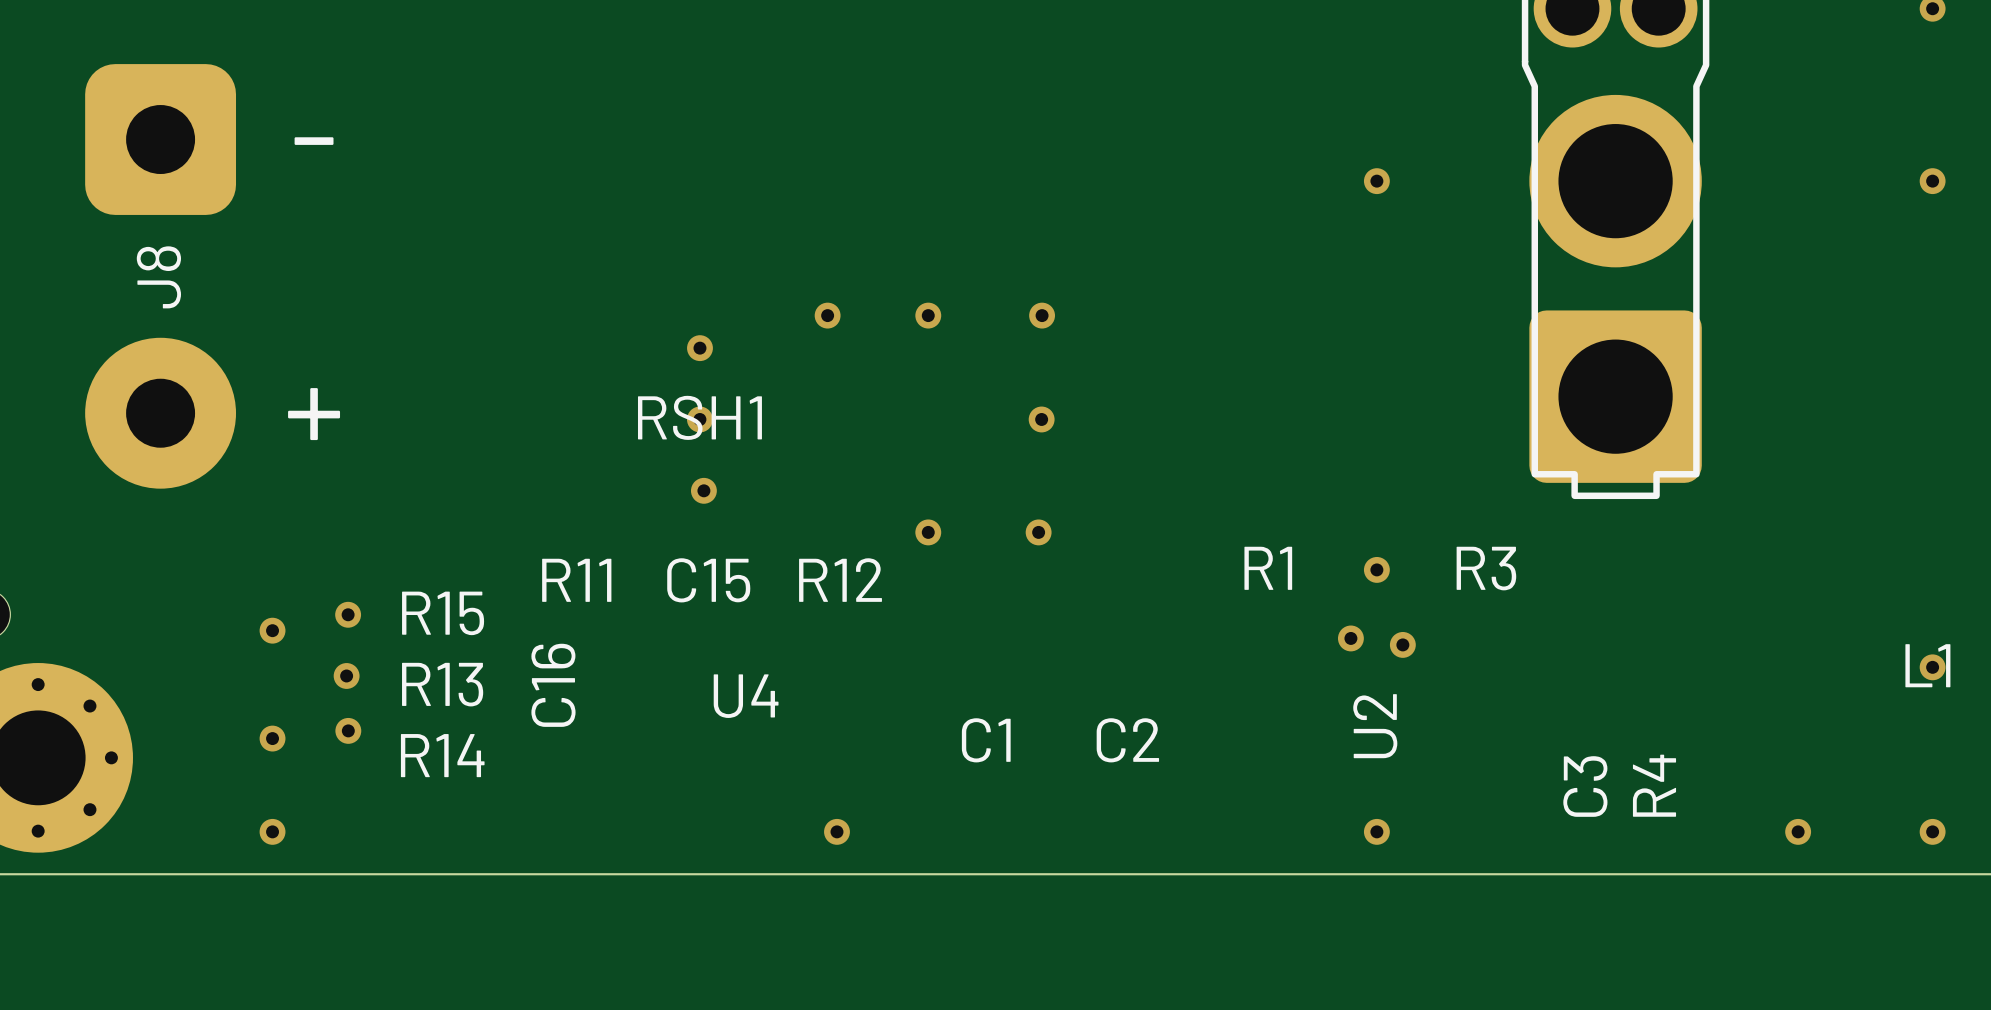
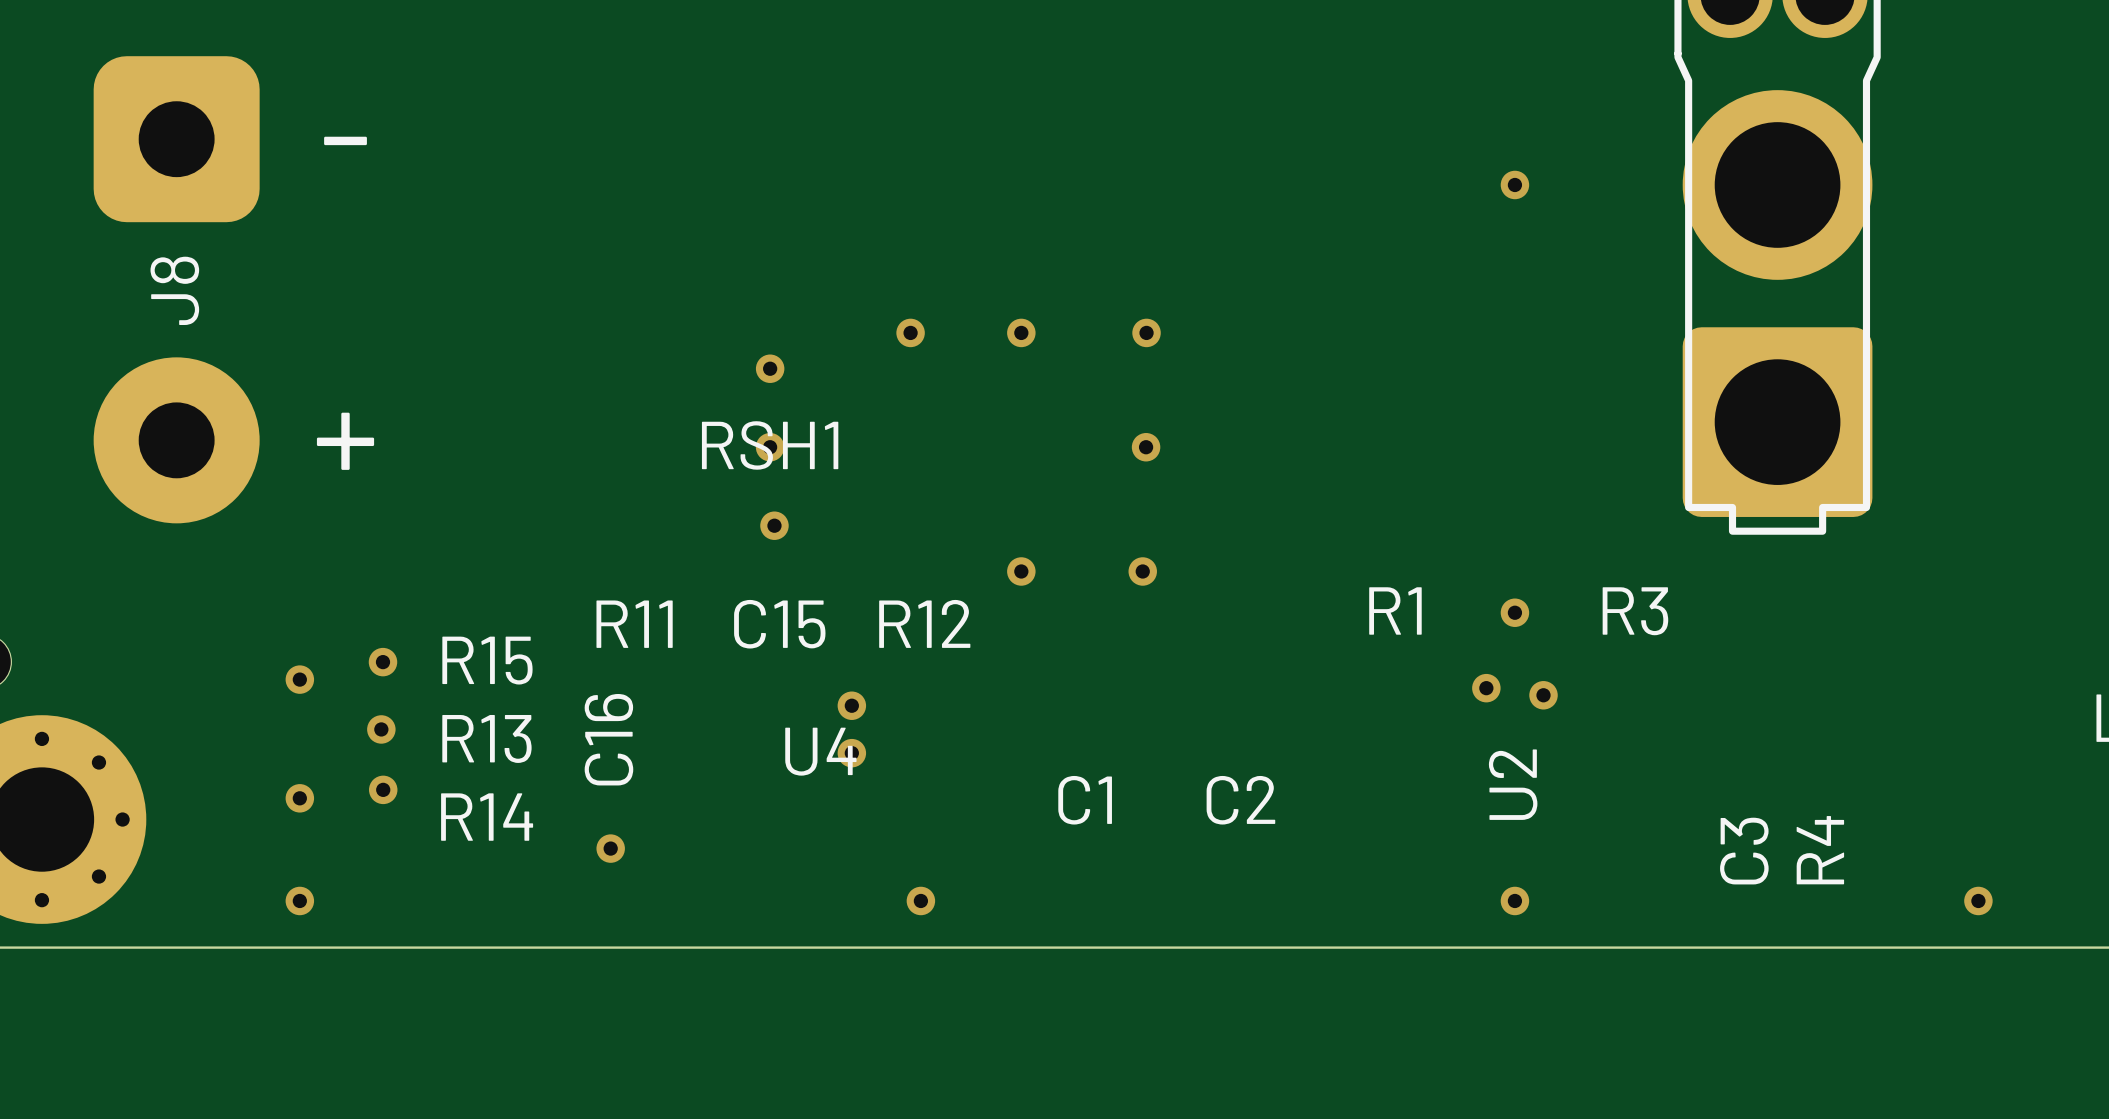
via: none -> (851, 705)
via: none -> (851, 753)
via: none -> (610, 848)

